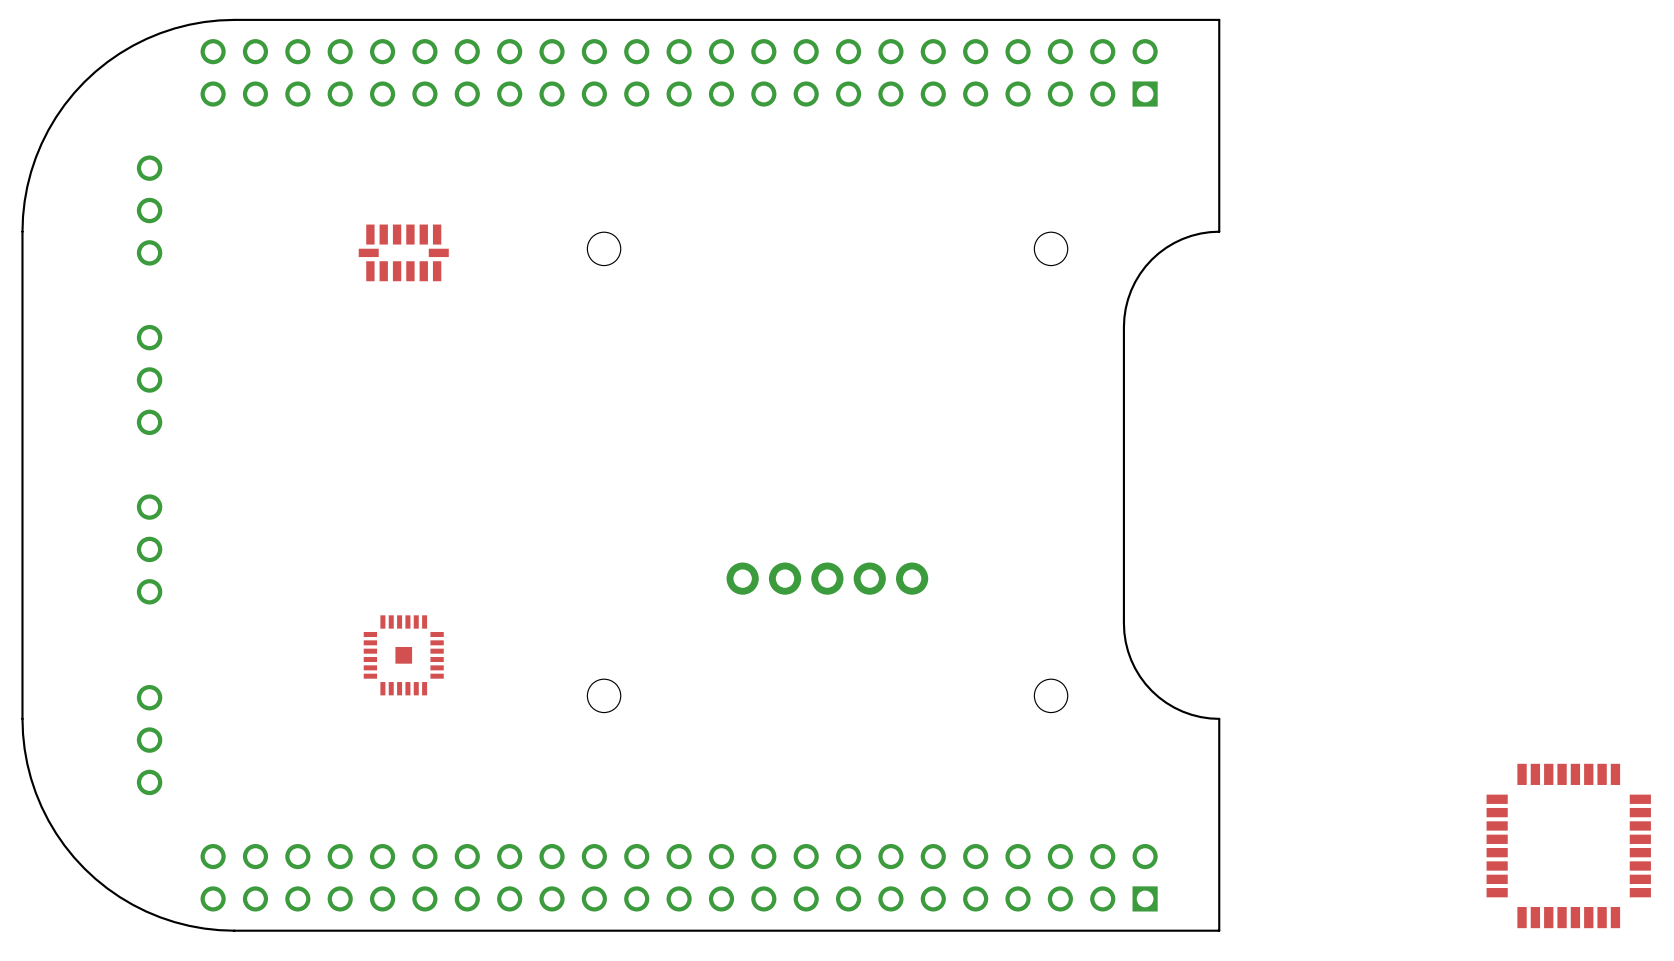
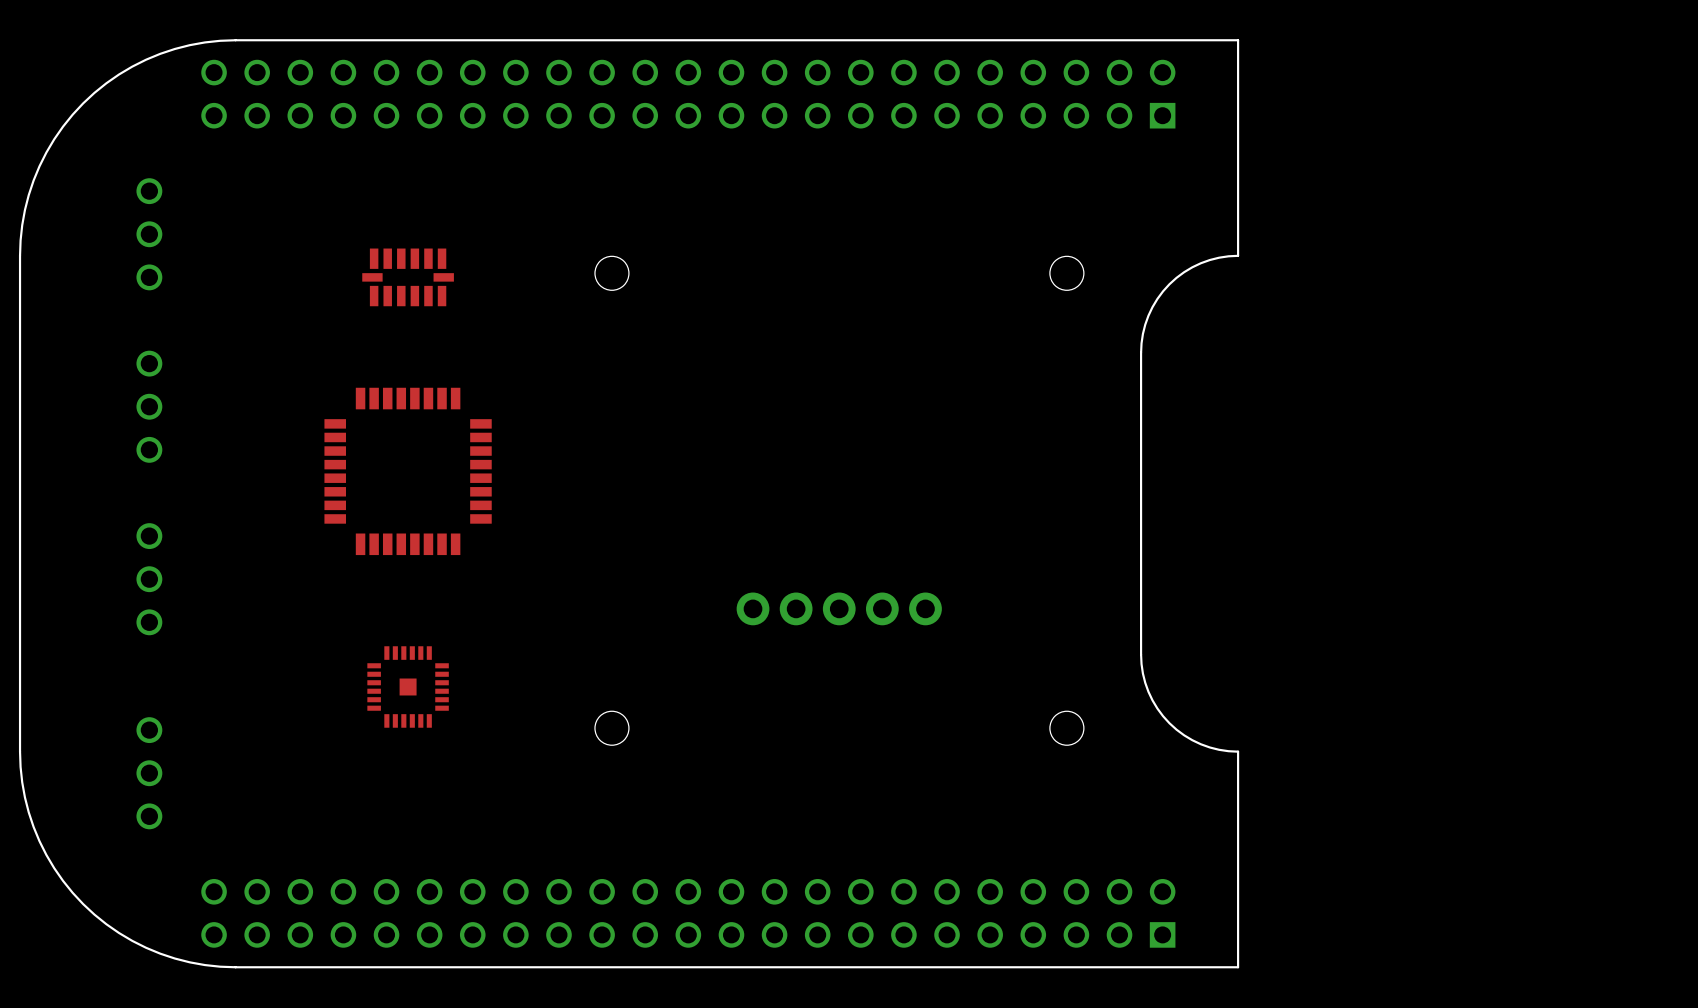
part: none -> (408, 471)
part: (1568, 845) -> none

